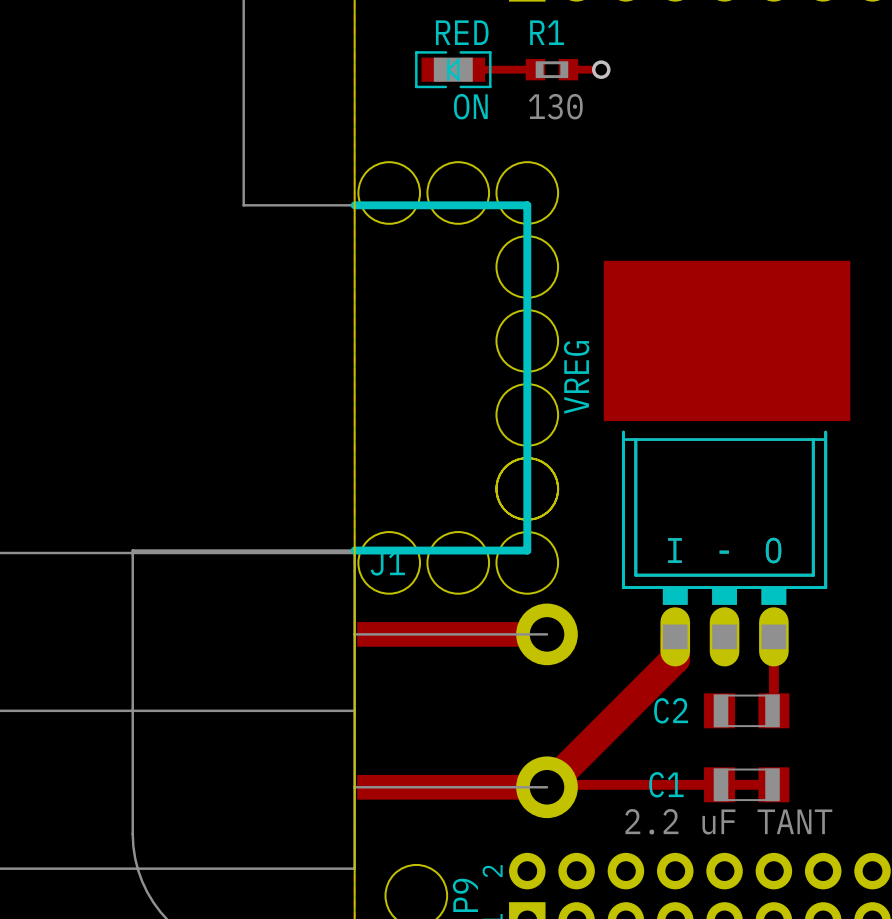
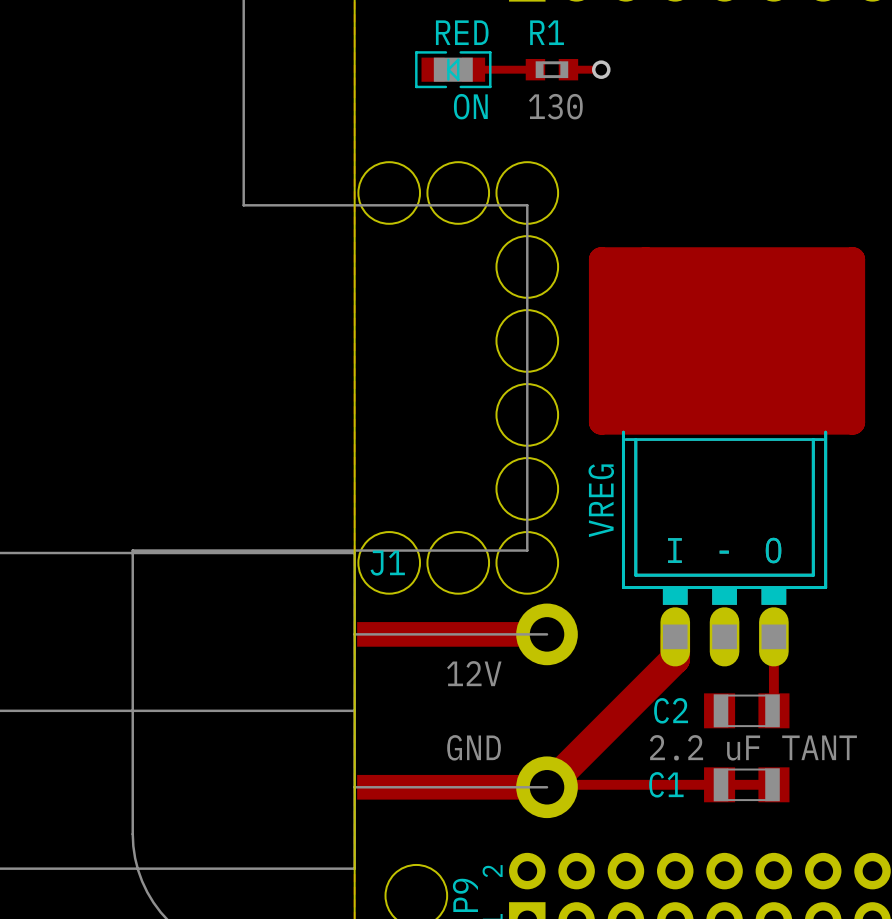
line: (354, 205) (527, 205) (527, 550) (354, 550) -> none
track: none -> (601, 259) (852, 259) (852, 422) (601, 422) (601, 259)
VREG name position: VREG (576, 377) -> VREG (601, 500)
text: none -> 12V (474, 673)
text: none -> GND (474, 747)
C1 value position: 2.2 uF TANT (728, 821) -> 2.2 uF TANT (753, 747)

